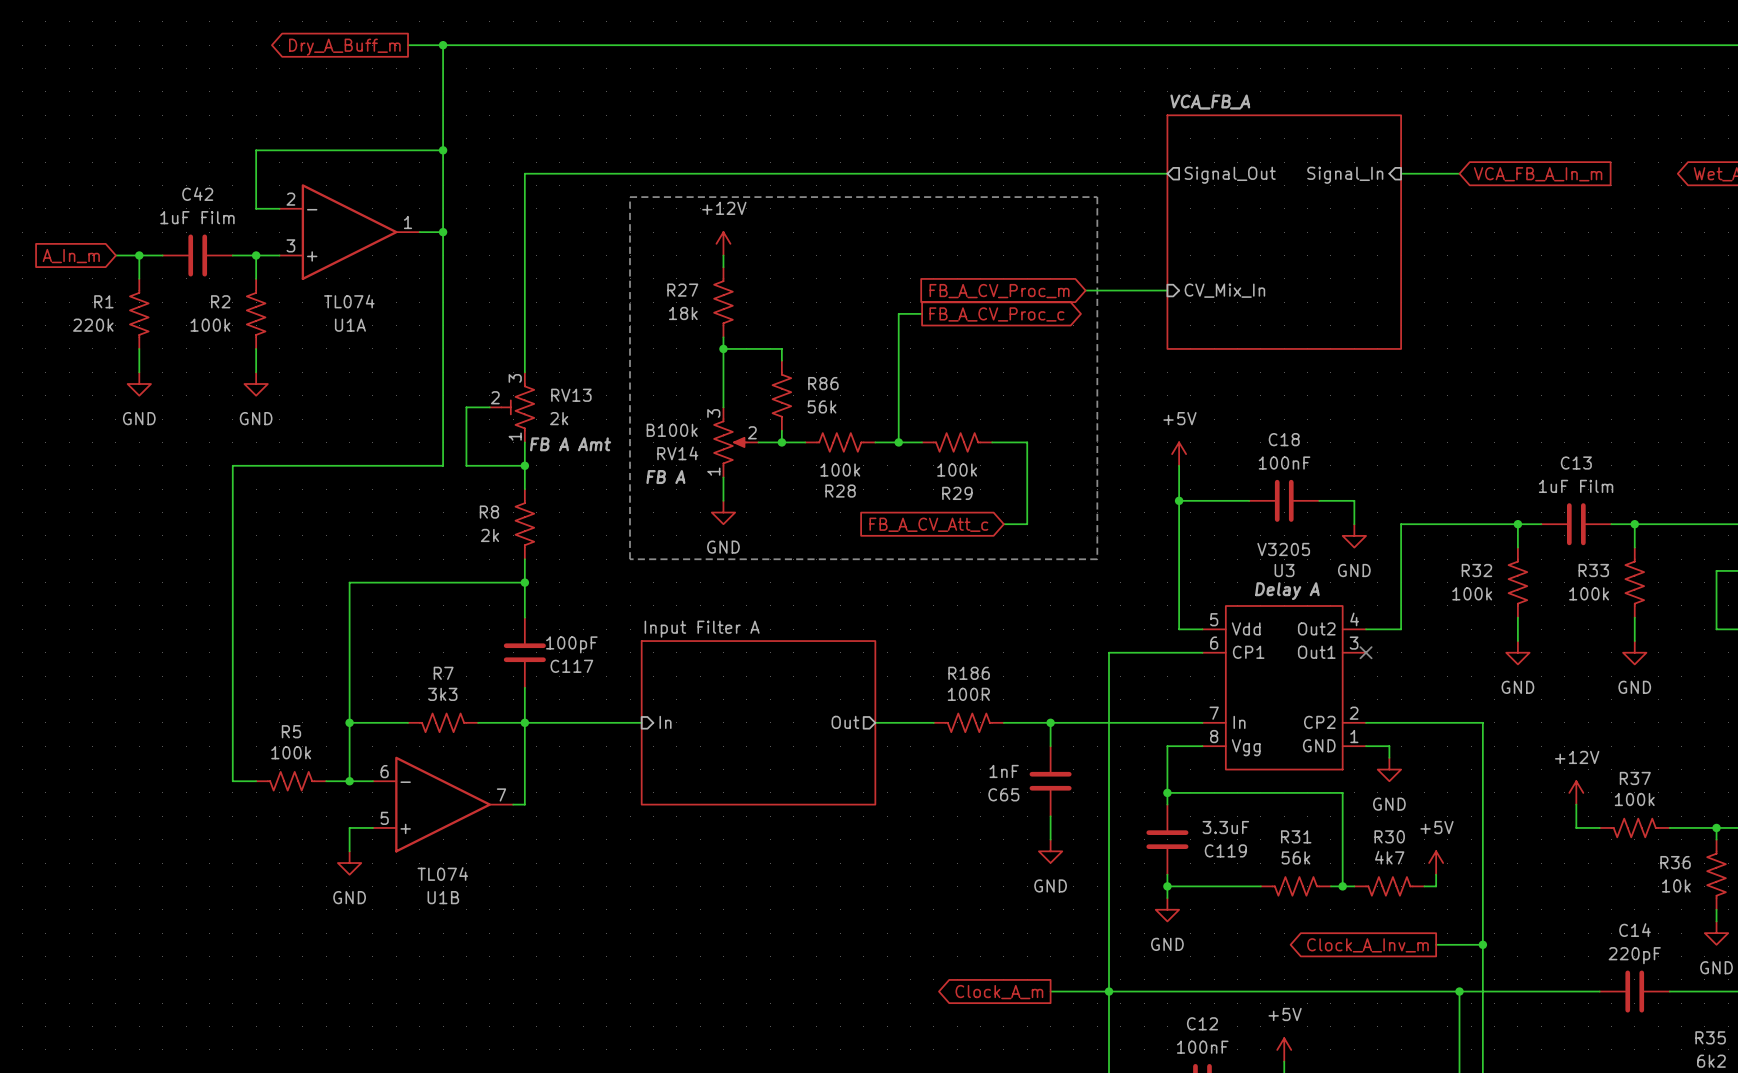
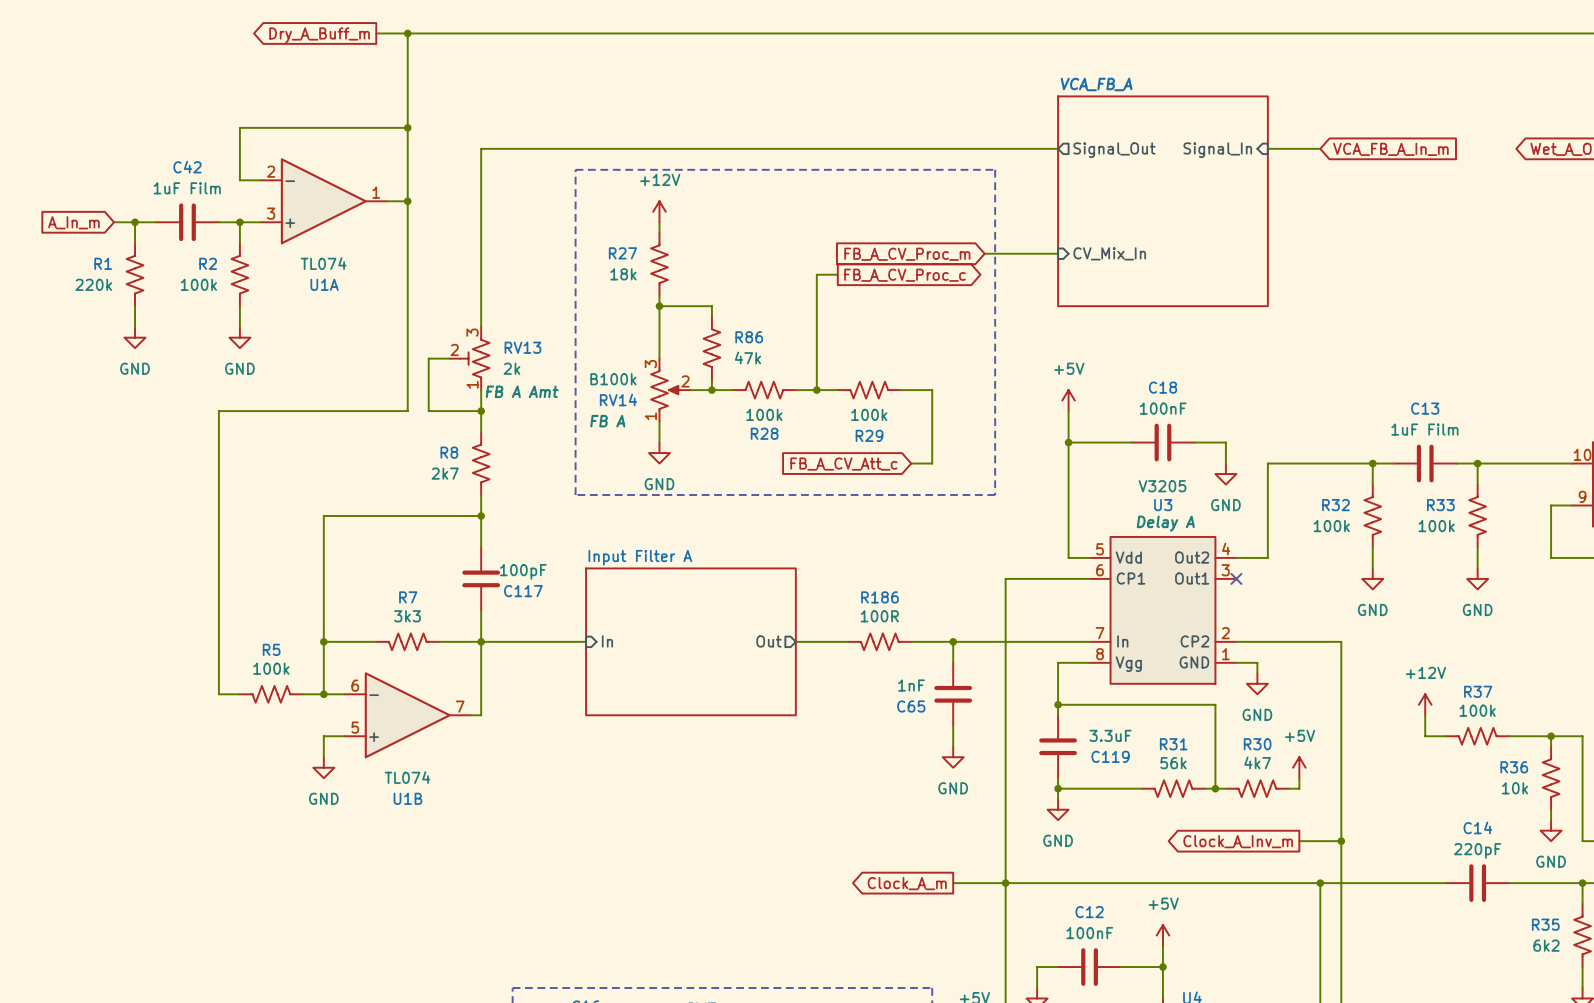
R86 value: 56k (822, 406) -> 47k (747, 357)
R8 value: 2k (489, 535) -> 2k7 (445, 473)

